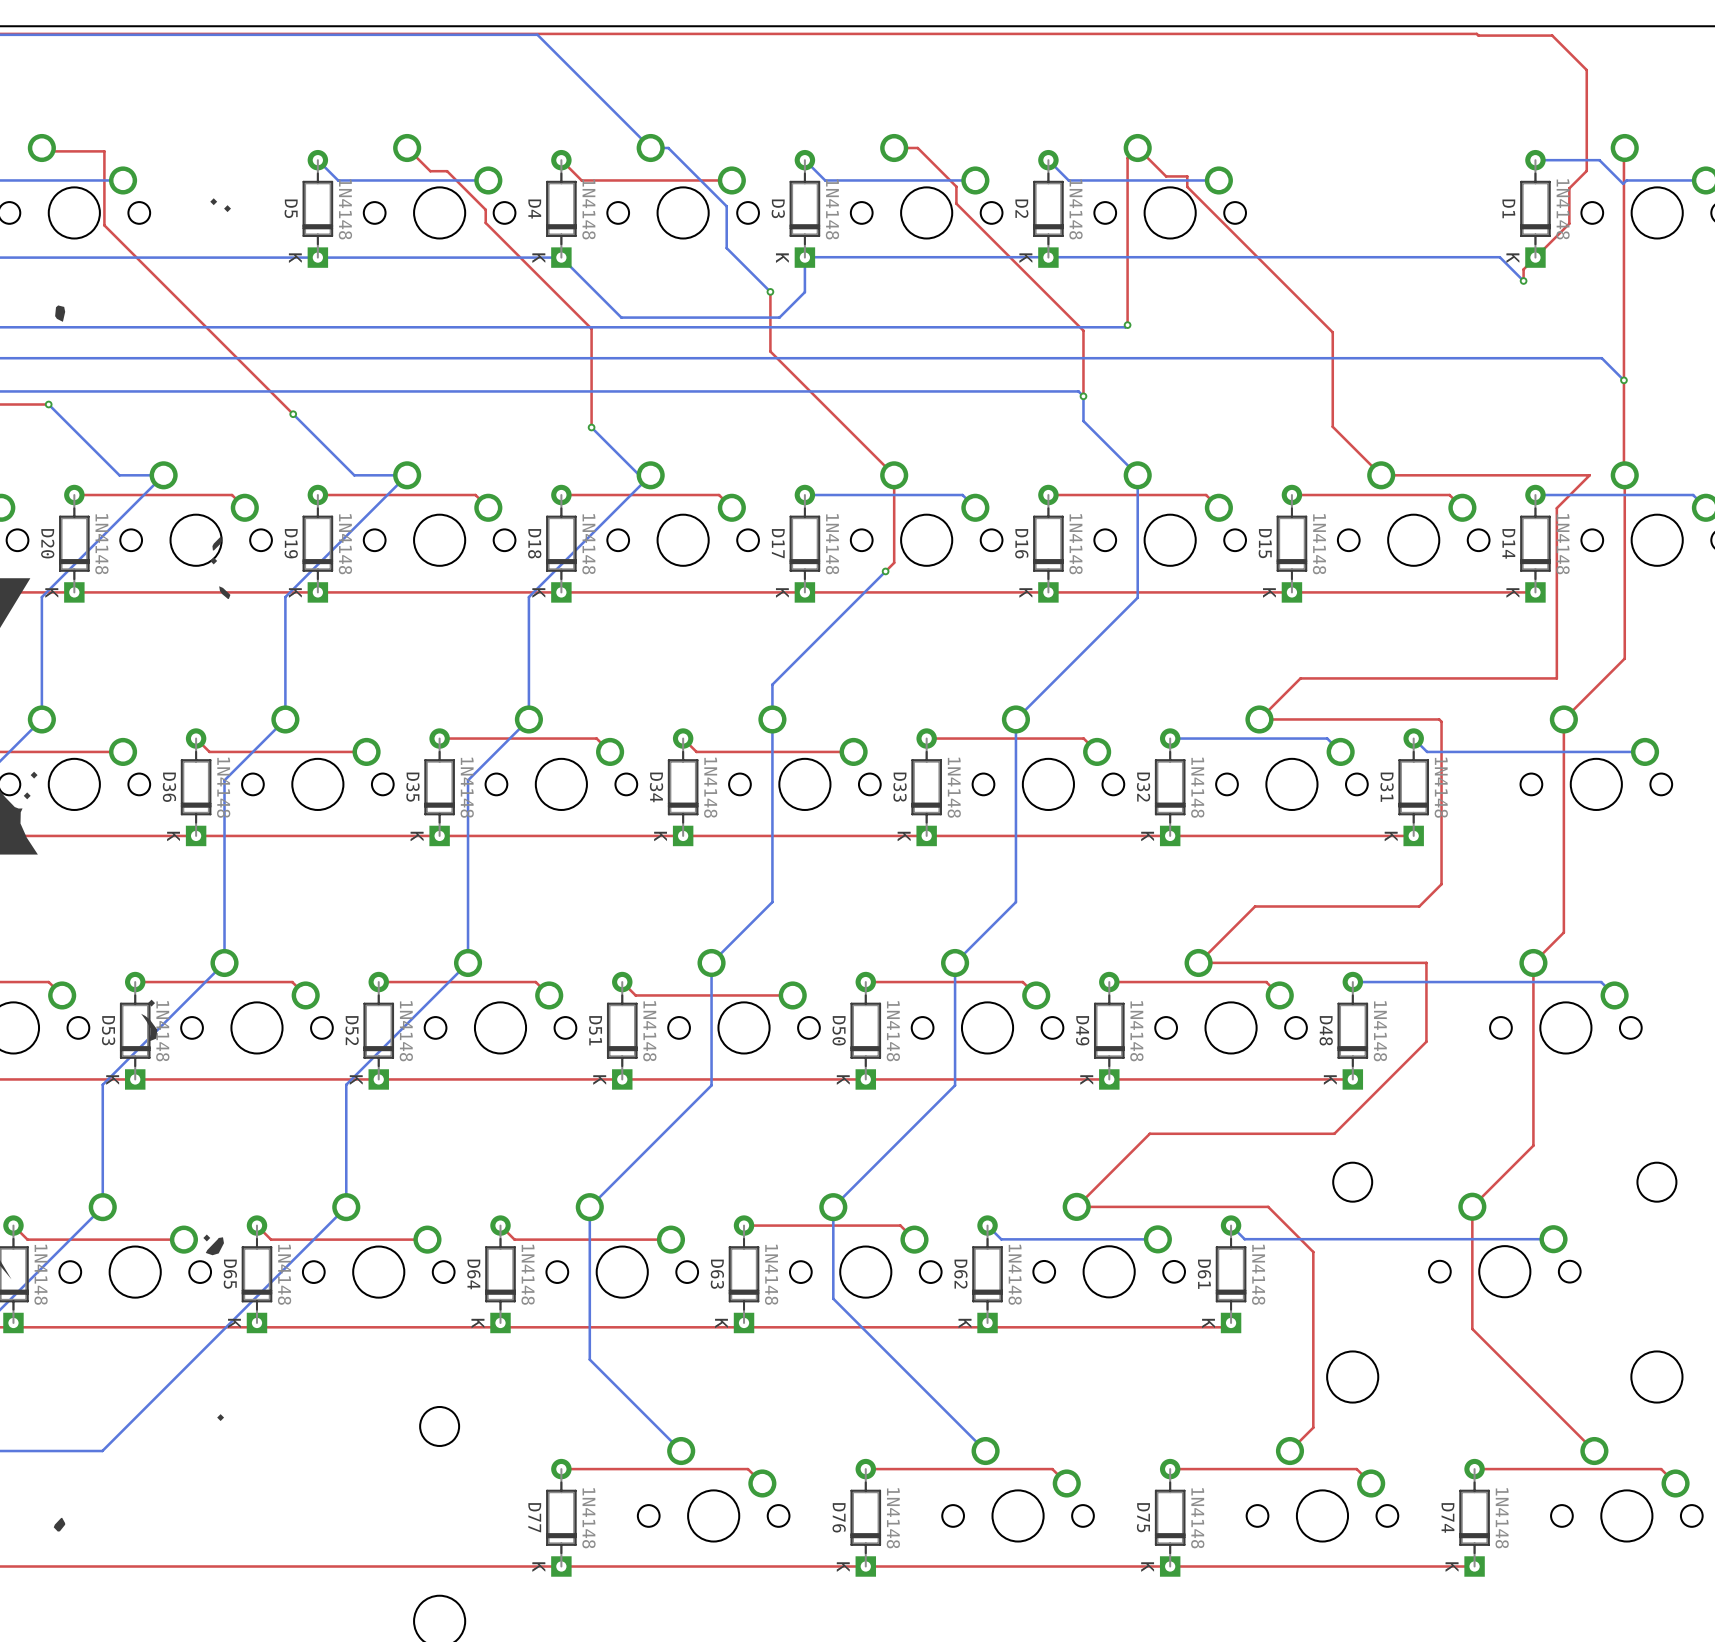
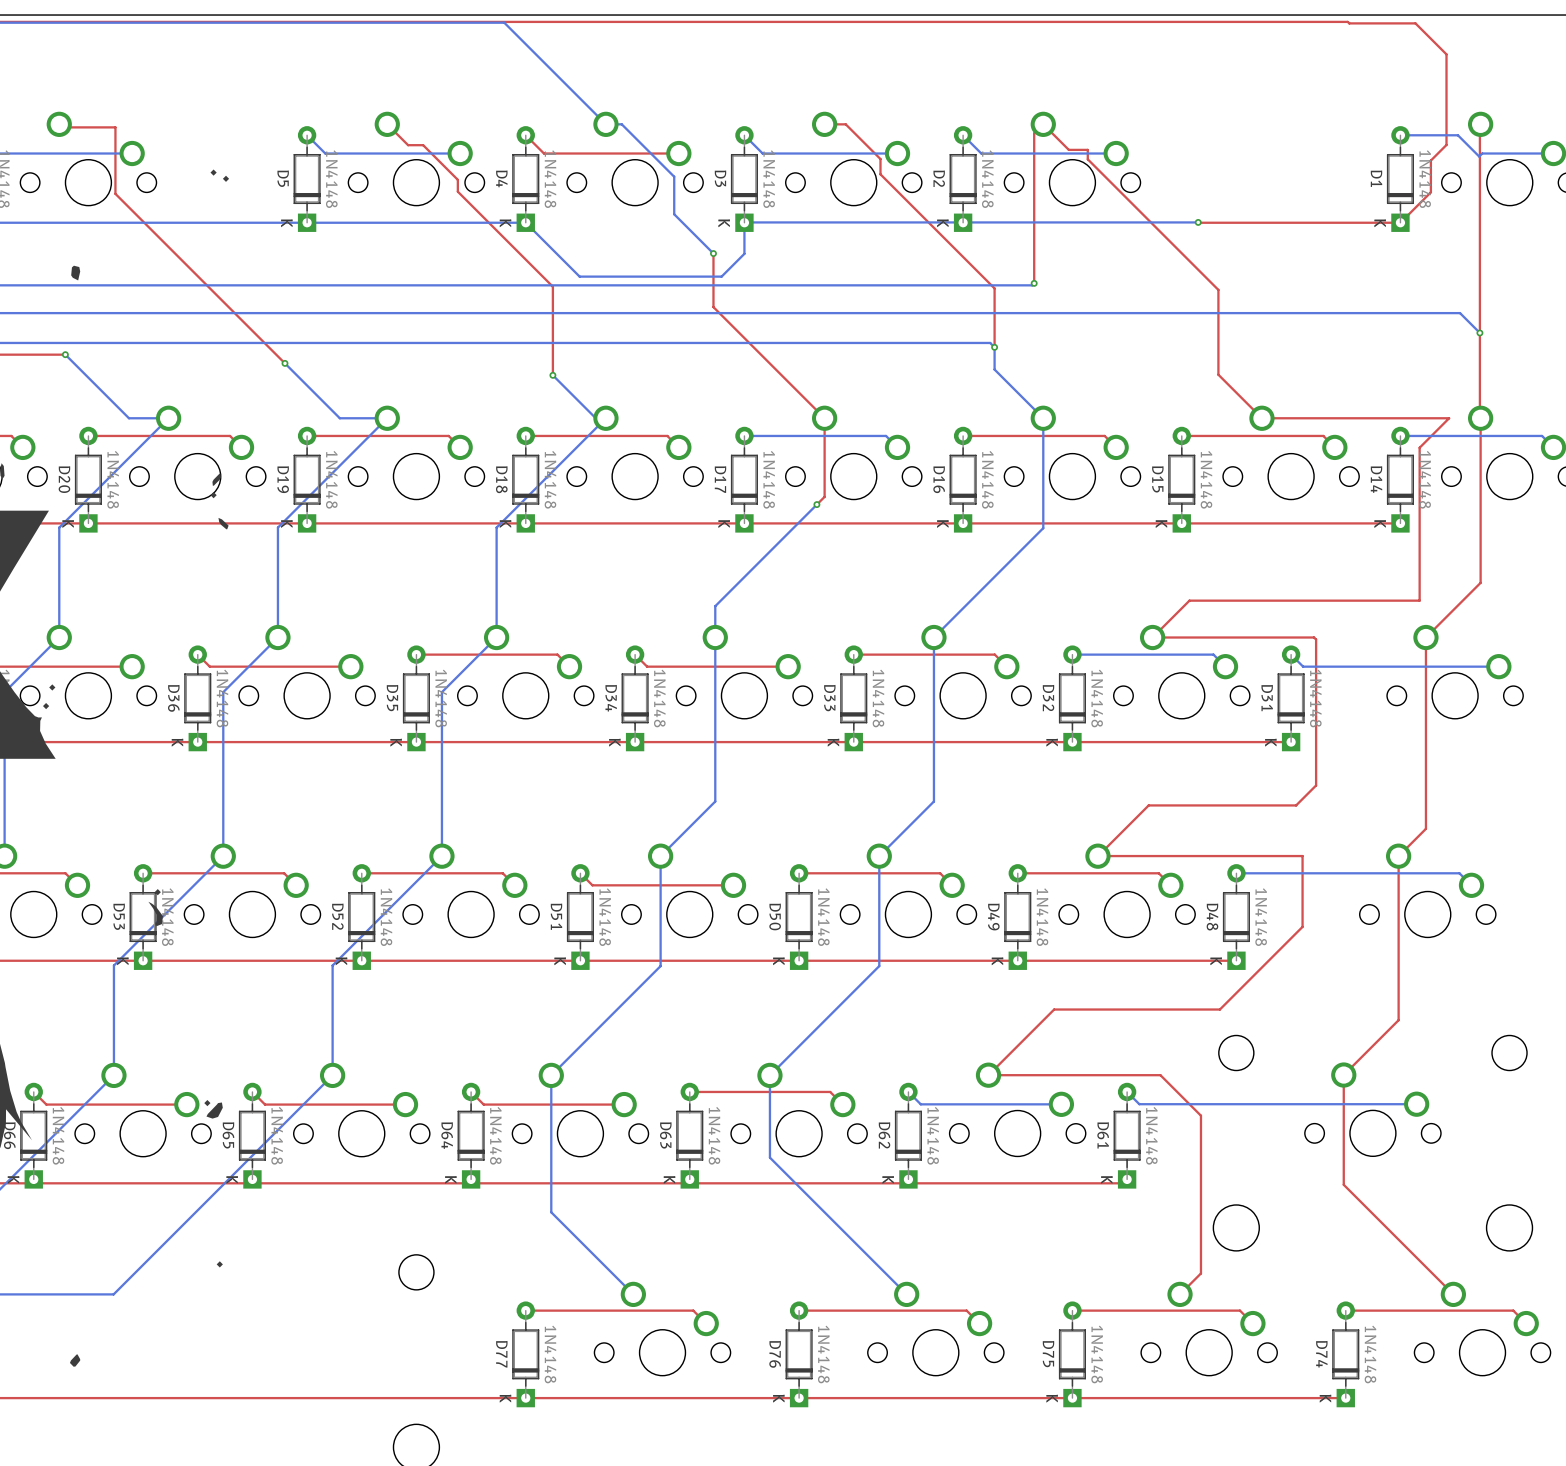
bottom track: (1310, 257) (1499, 257) (1523, 280) -> none
via: none -> (1198, 222)
top track: (1535, 257) (1523, 269) (1523, 280) -> (1400, 222) (1198, 222)
via: (1523, 280) -> none

